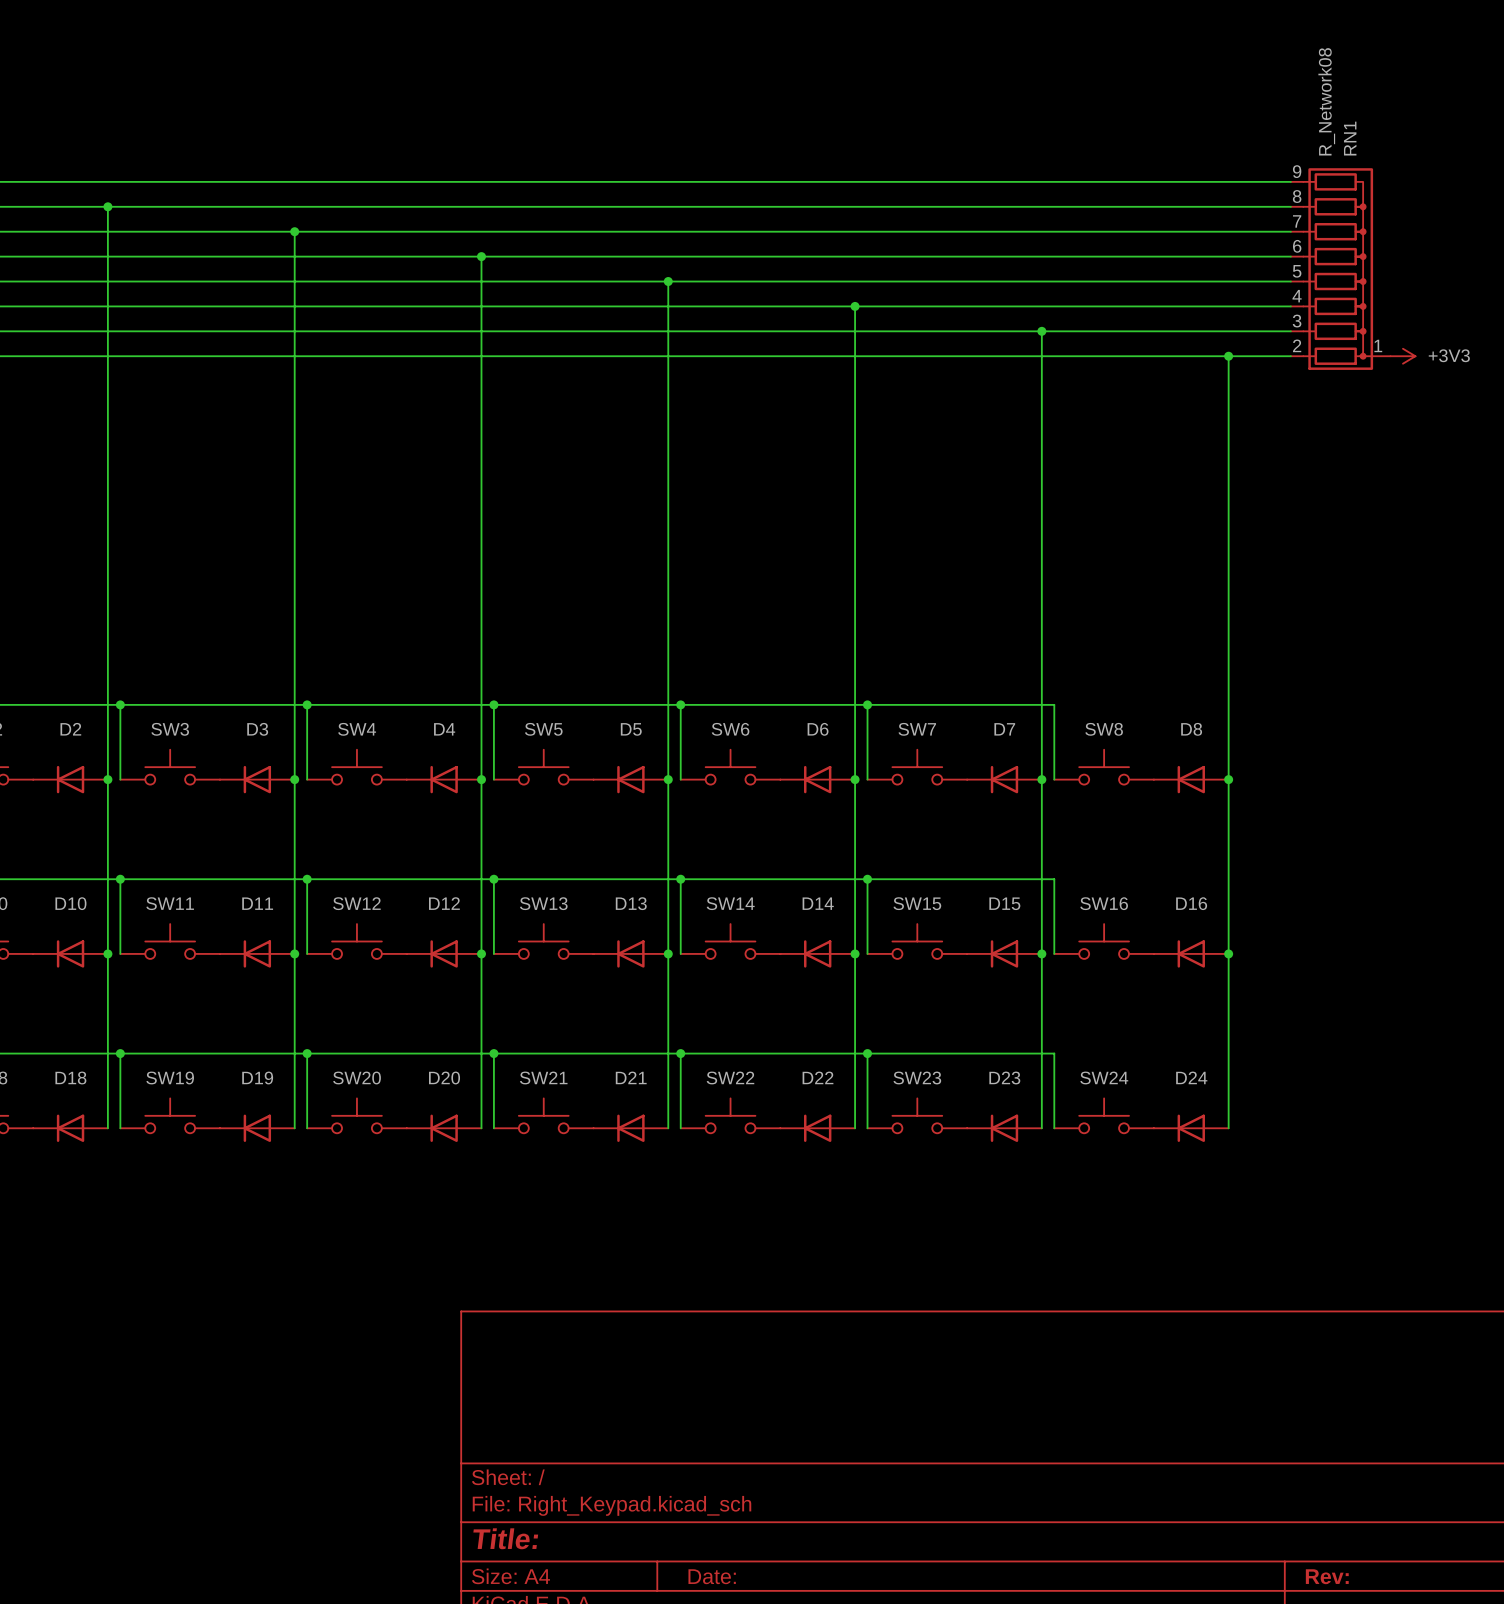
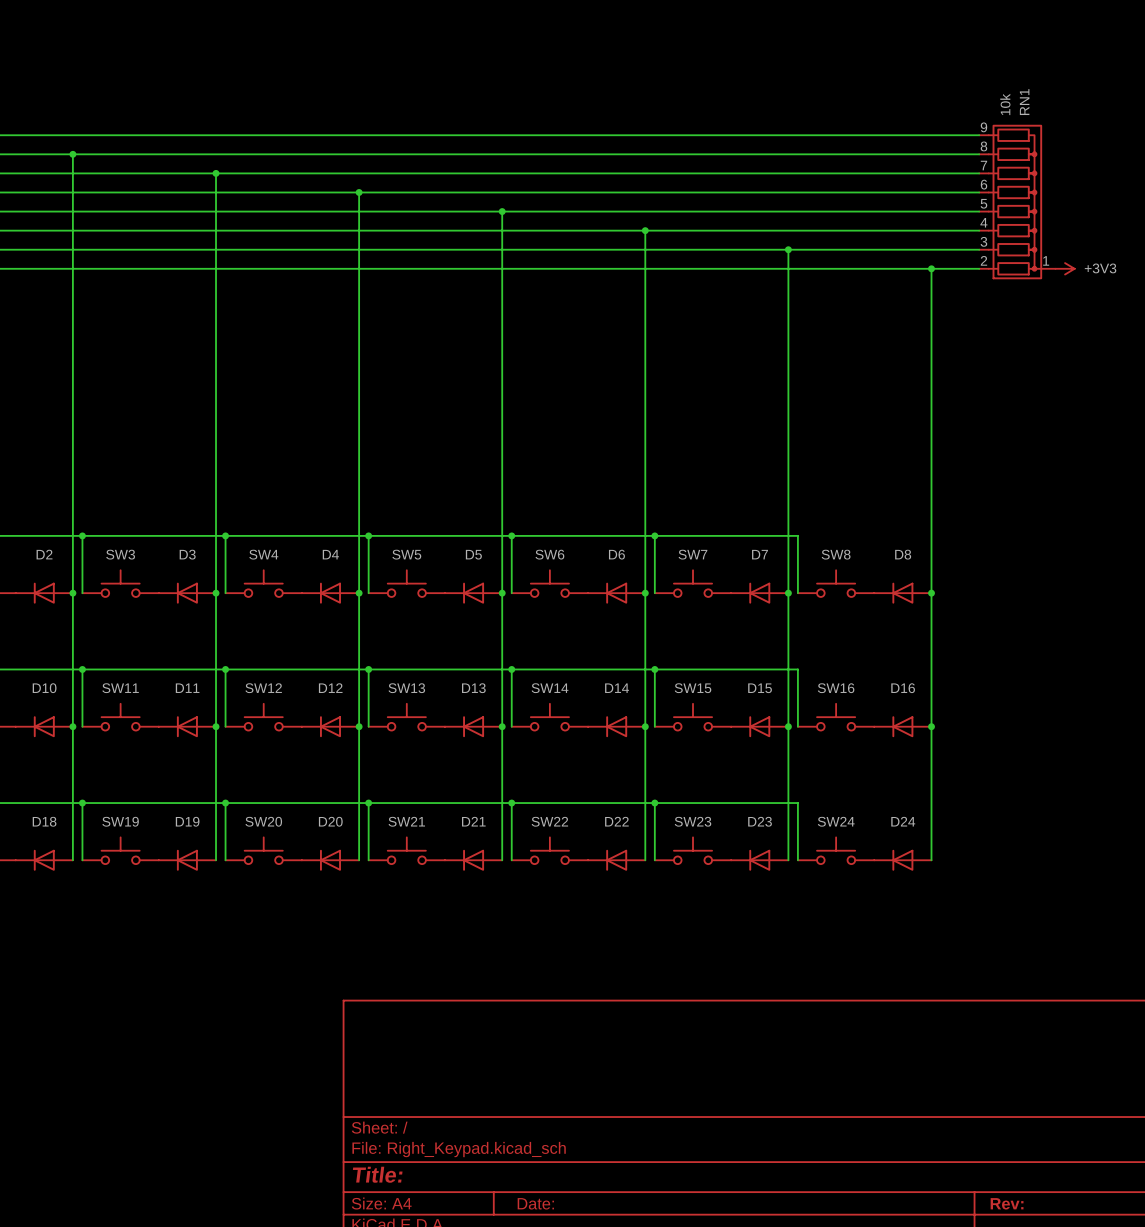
RN1 value: R_Network08 (1326, 101) -> 10k (1005, 104)

